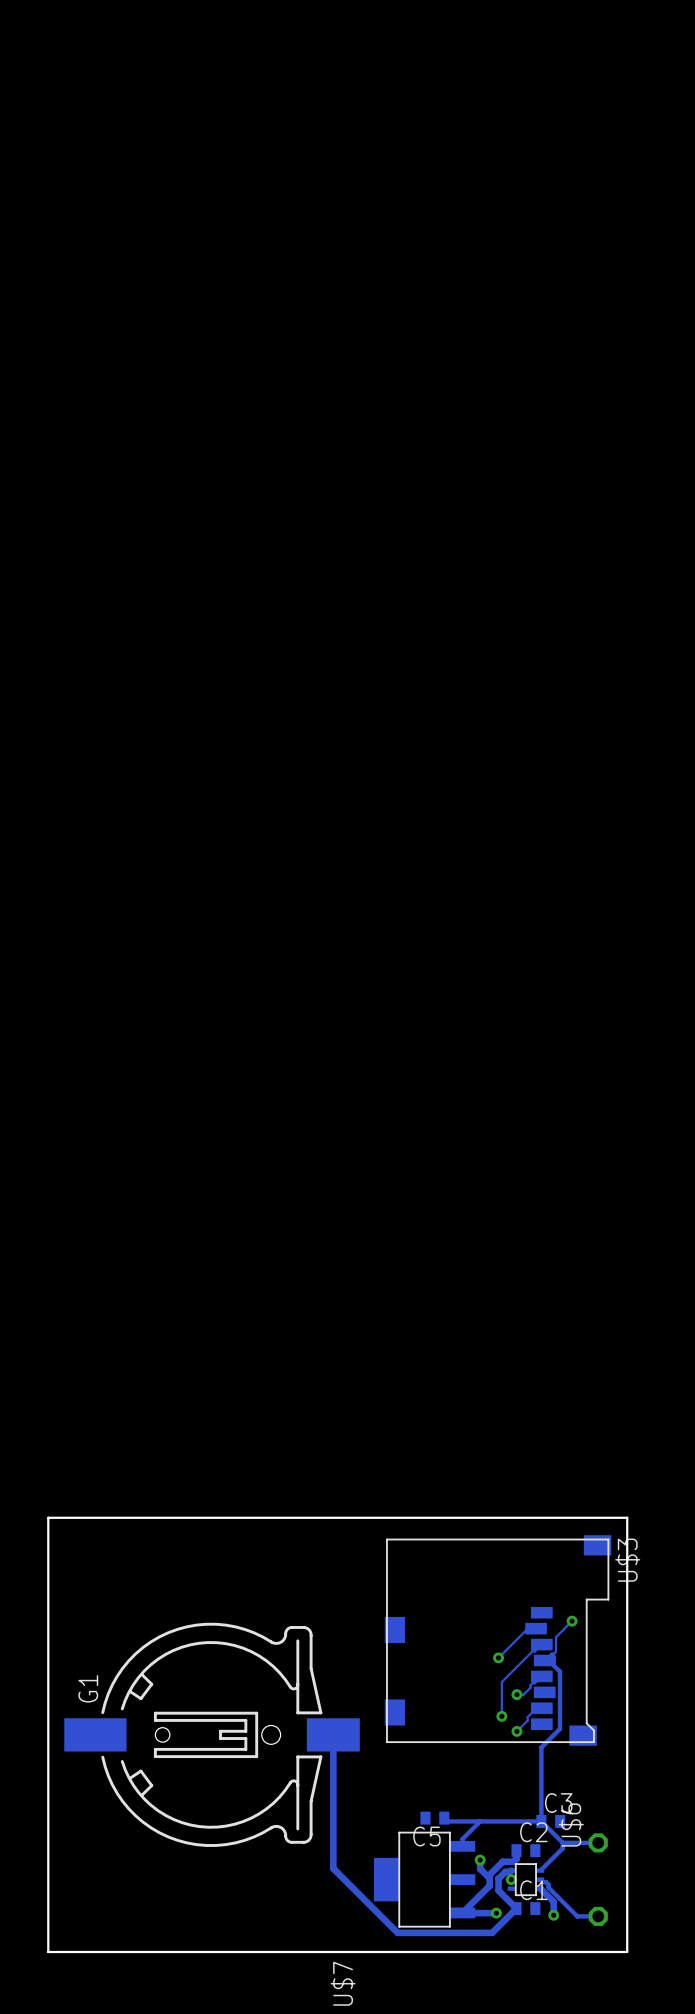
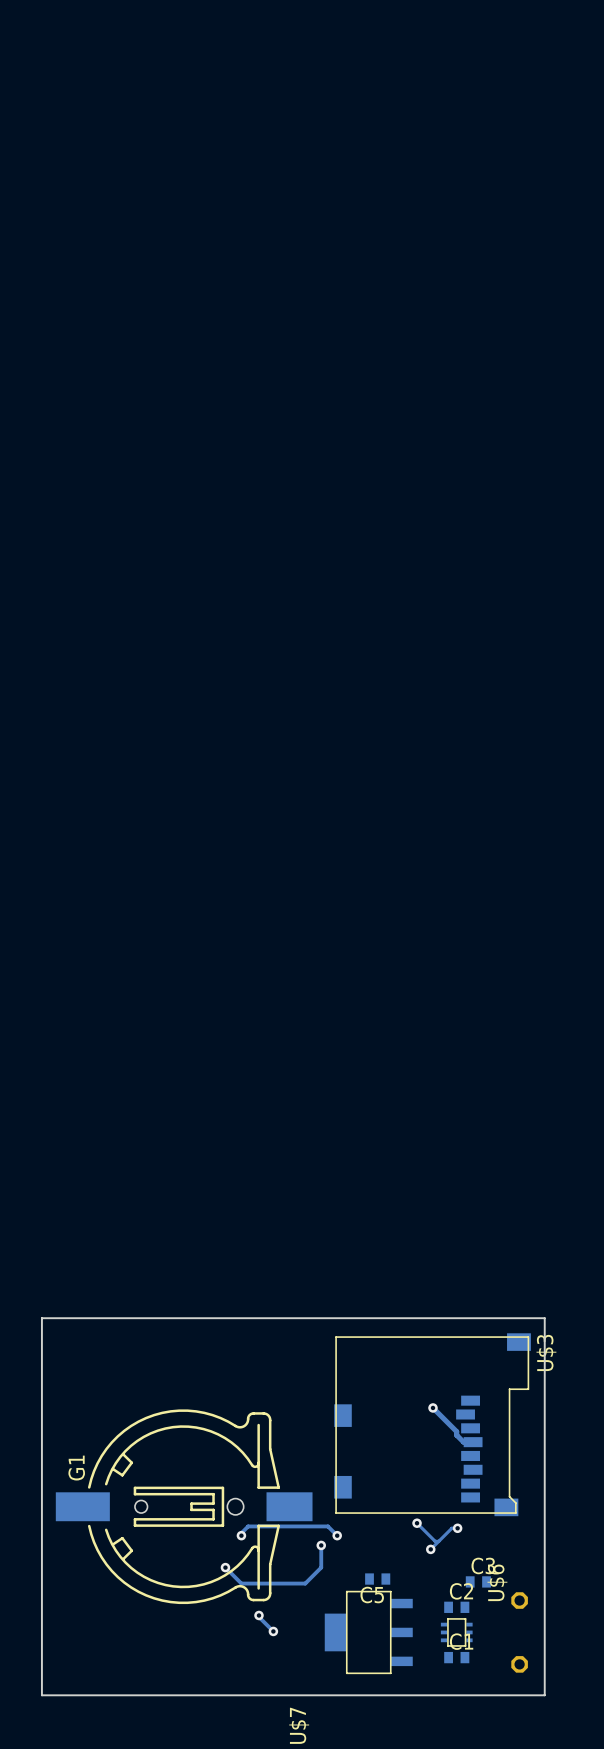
track: none -> (432, 1407) (456, 1431) (456, 1435) (463, 1442) (473, 1442)
via: none -> (432, 1407)
track: (572, 1621) (555, 1637) (555, 1651) (544, 1660) (551, 1660) (553, 1657) (553, 1665) (559, 1671) (559, 1728) (541, 1747) (541, 1821) -> none
via: (572, 1621) -> none
track: (536, 1628) (527, 1628) (498, 1657) -> none
track: (541, 1644) (501, 1682) (501, 1716) -> none
via: (498, 1657) -> none
track: (541, 1676) (532, 1683) (523, 1694) (516, 1694) -> none
via: (516, 1694) -> none
track: (541, 1708) (536, 1708) (516, 1731) -> none
via: (501, 1716) -> none
via: (516, 1731) -> none
track: (333, 1734) (333, 1868) (397, 1932) (492, 1932) (516, 1908) (498, 1890) (498, 1878) -> none
track: none -> (417, 1523) (435, 1541) (438, 1541)
via: none -> (417, 1523)
track: none -> (457, 1528) (451, 1528) (430, 1549)
via: none -> (457, 1528)
via: none -> (241, 1535)
track: none -> (337, 1535) (327, 1526) (248, 1526) (241, 1535)
via: none -> (337, 1535)
track: none -> (321, 1545) (321, 1567) (305, 1583) (241, 1583) (225, 1567)
via: none -> (321, 1545)
via: none -> (430, 1549)
via: none -> (225, 1567)
track: (444, 1818) (447, 1821) (541, 1821) -> none
track: (480, 1821) (462, 1839) (462, 1846) -> none
track: (541, 1821) (562, 1842) -> none
track: (562, 1842) (562, 1848) (540, 1870) -> none
track: (598, 1842) (562, 1842) -> none
track: (516, 1850) (516, 1859) (513, 1861) (502, 1861) (489, 1874) (489, 1885) (462, 1912) -> none
track: none -> (258, 1615) (273, 1631)
via: none -> (258, 1615)
track: (480, 1860) (480, 1868) (489, 1878) -> none
via: (480, 1860) -> none
track: (511, 1870) (505, 1871) (498, 1878) -> none
via: none -> (273, 1631)
via: (511, 1879) -> none
track: (540, 1879) (548, 1884) (548, 1887) (577, 1916) (598, 1916) -> none
track: (540, 1888) (553, 1901) (553, 1915) -> none
track: (496, 1913) (462, 1913) -> none
via: (496, 1913) -> none
via: (553, 1915) -> none

